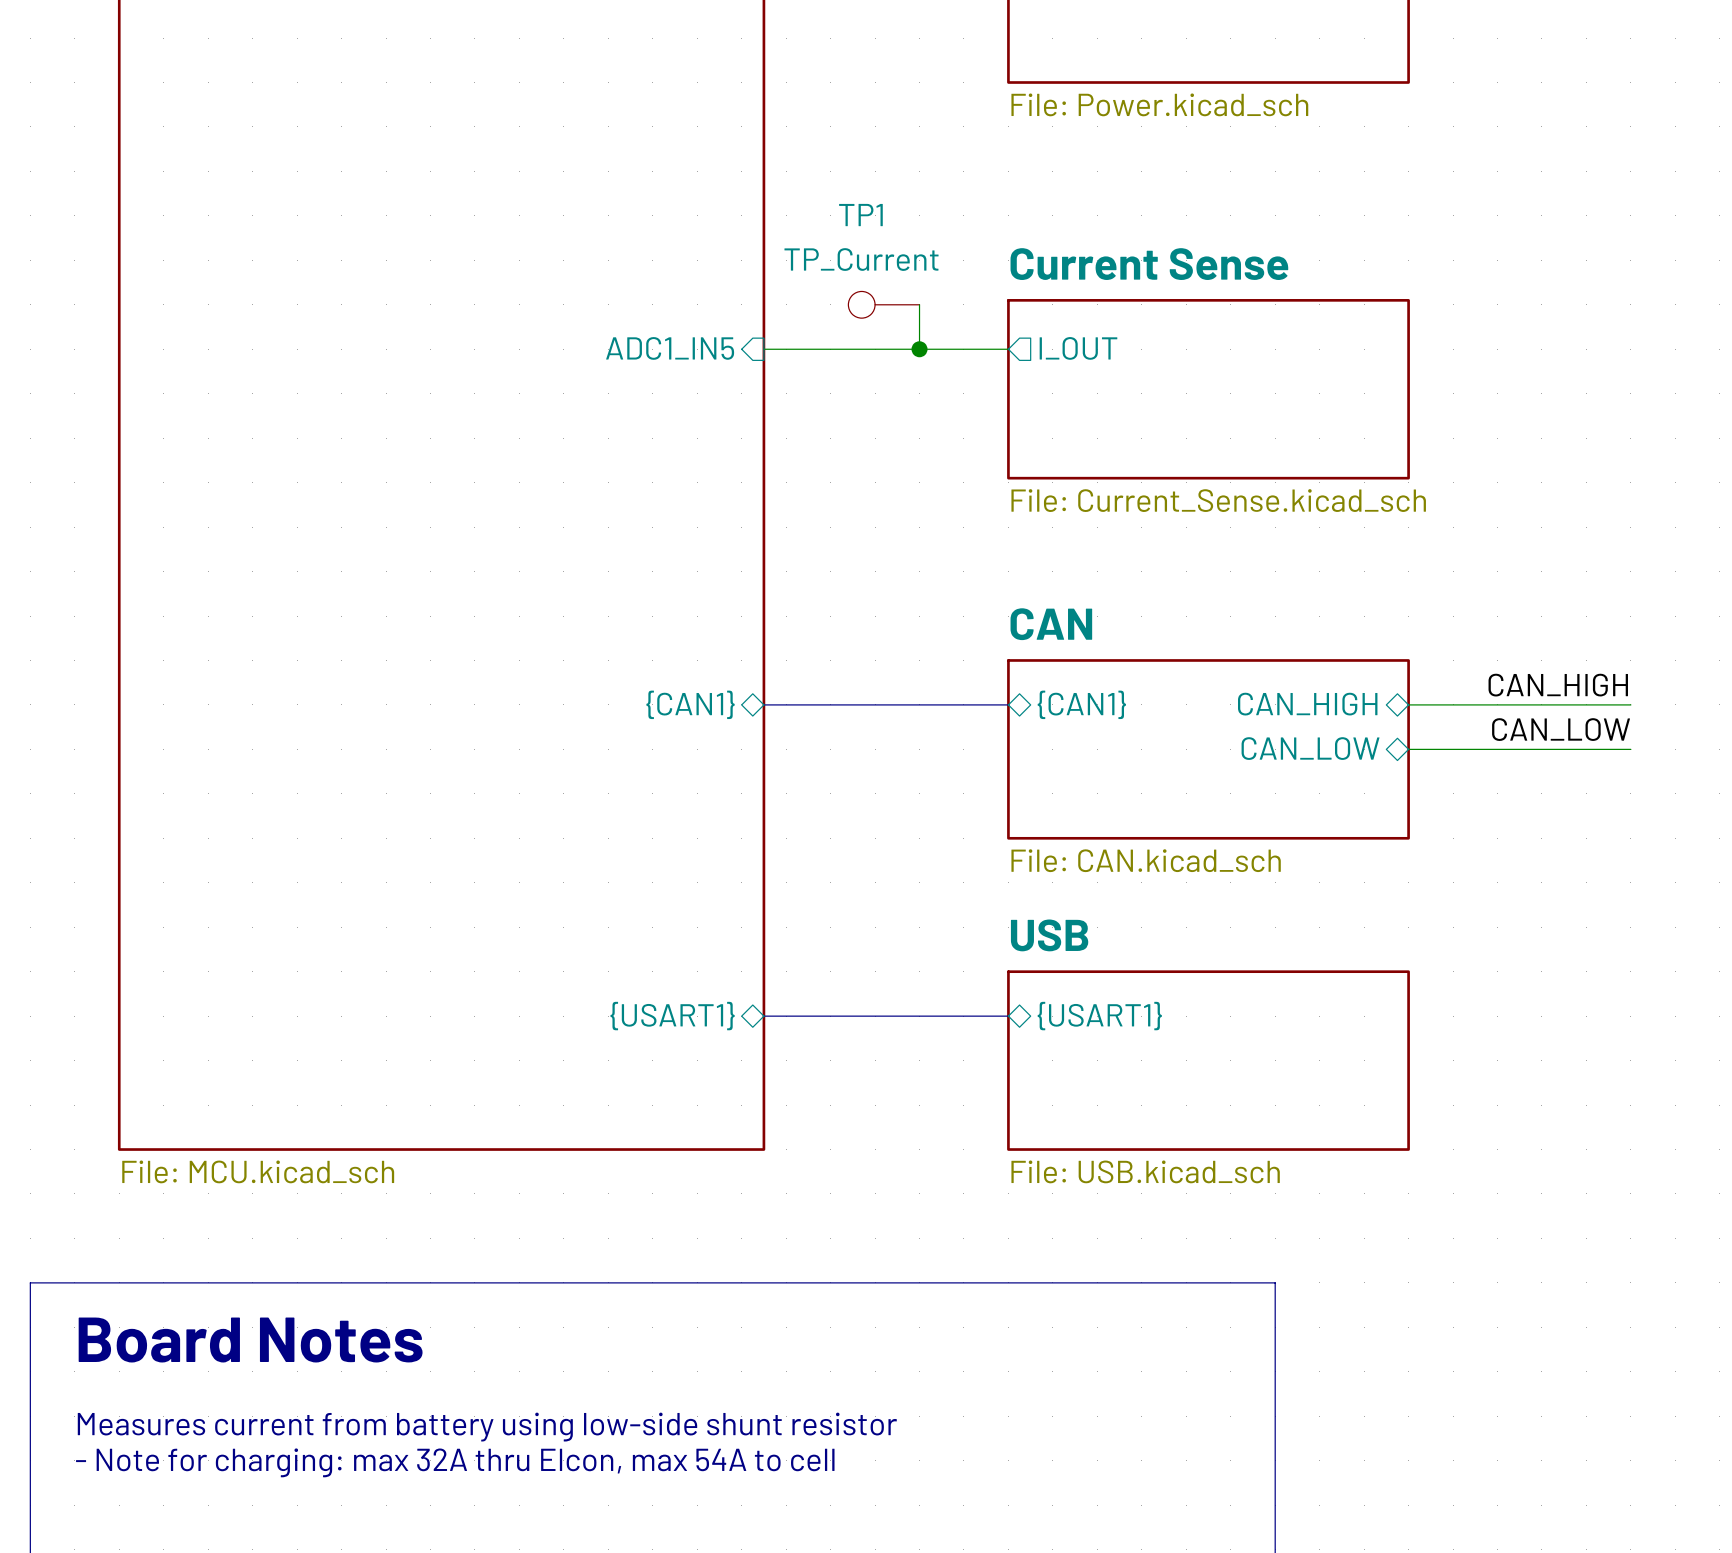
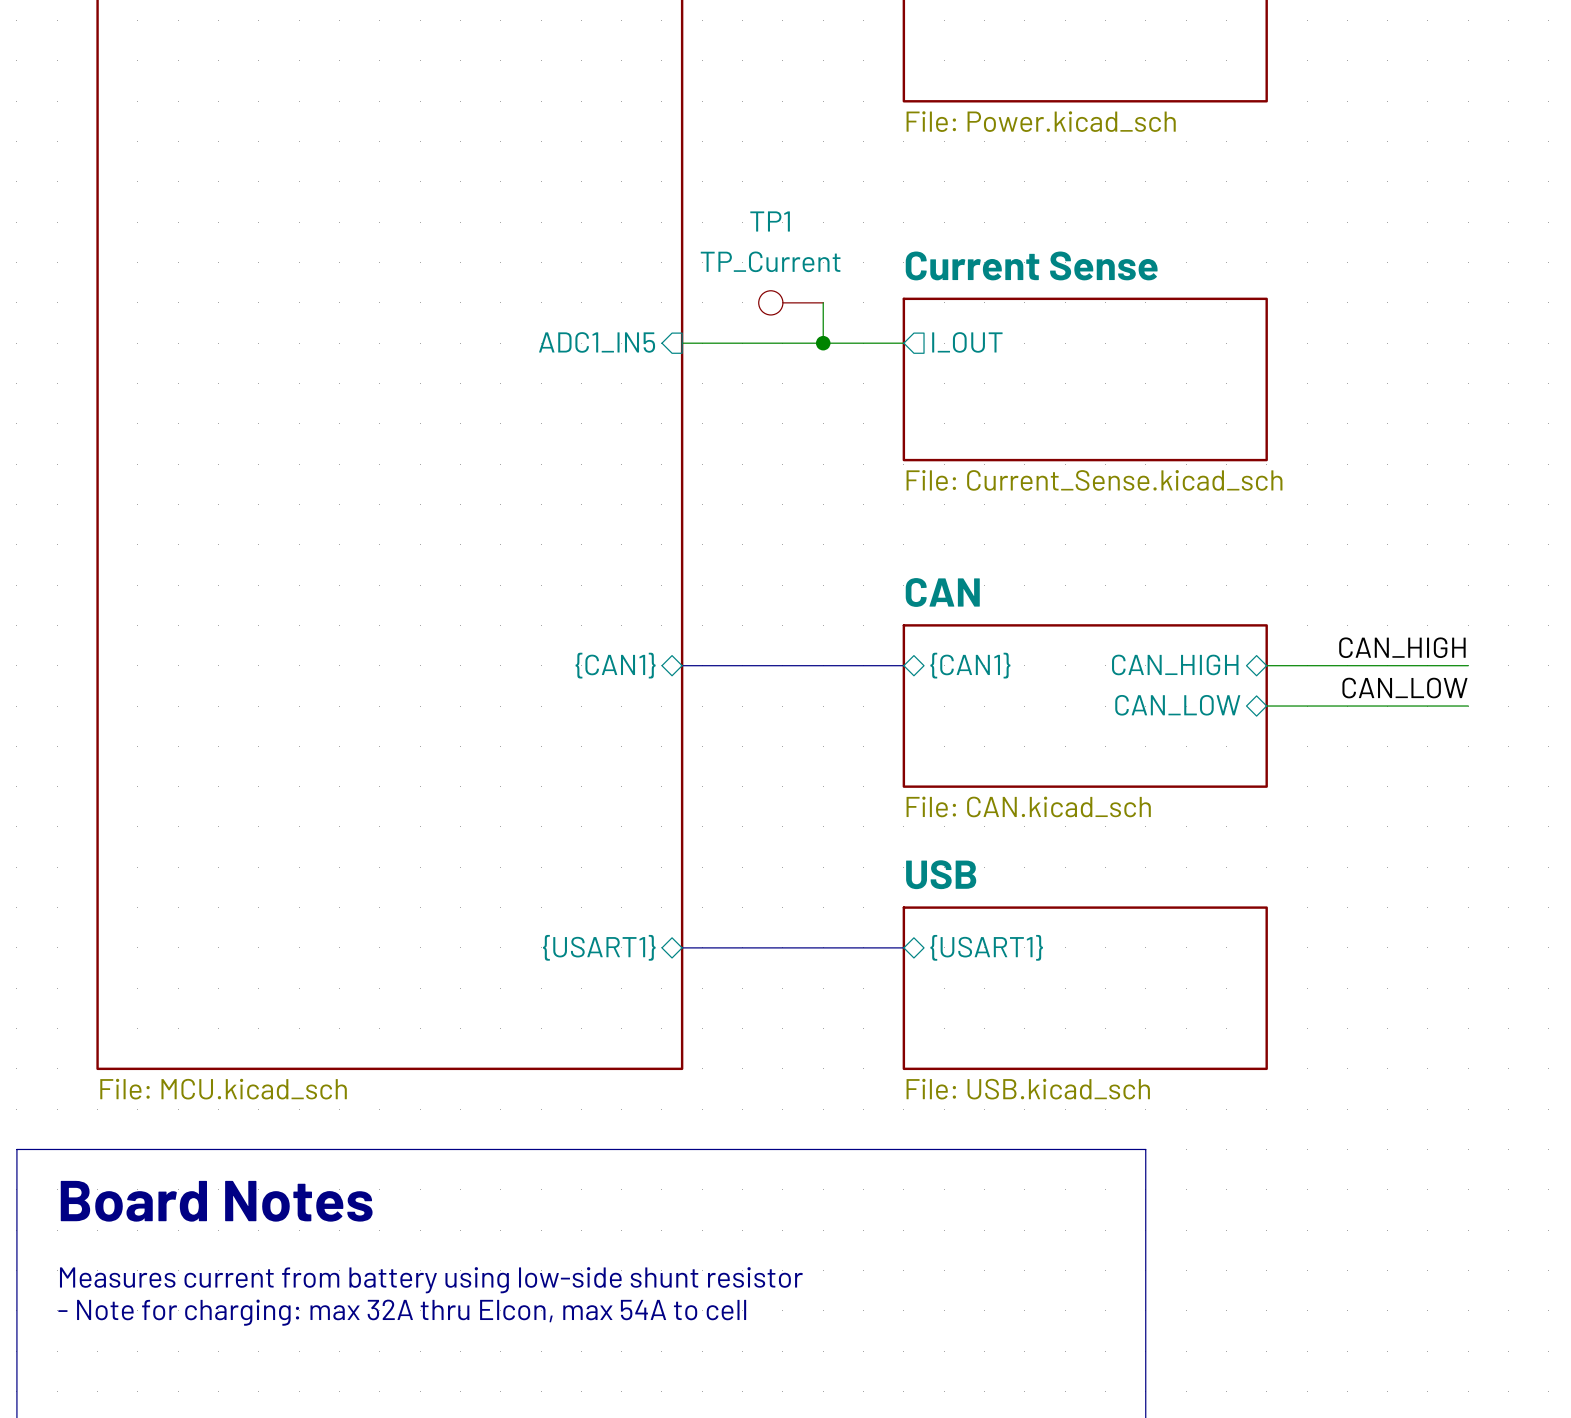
line: (30, 1282) (1275, 1282) -> (16, 1189) (16, 1149) (1145, 1149) (1145, 1189)
text: none -> Board Notes (216, 1201)
text: Board Notes (250, 1340) -> Measures current from battery using low-side shunt resistor (431, 1280)
text: Measures current from battery using low-side shunt resistor (487, 1427) -> - Note for charging: max 32A thru Elcon, max 54A to cell (402, 1312)
text: - Note for charging: max 32A thru Elcon, max 54A to cell (455, 1462) -> none

